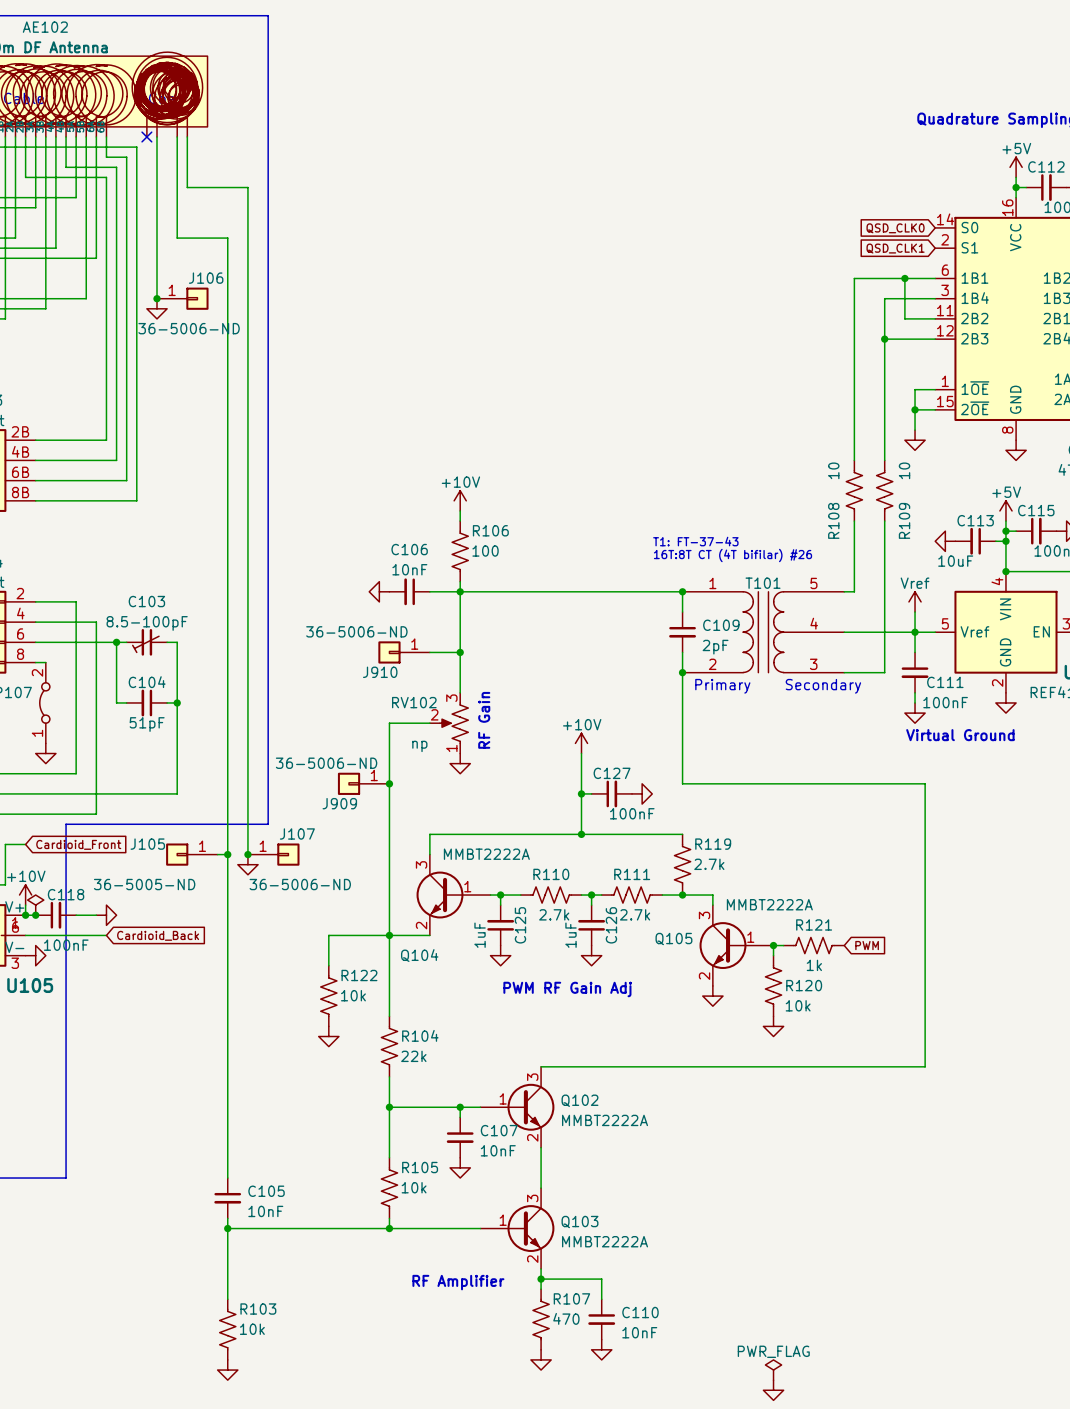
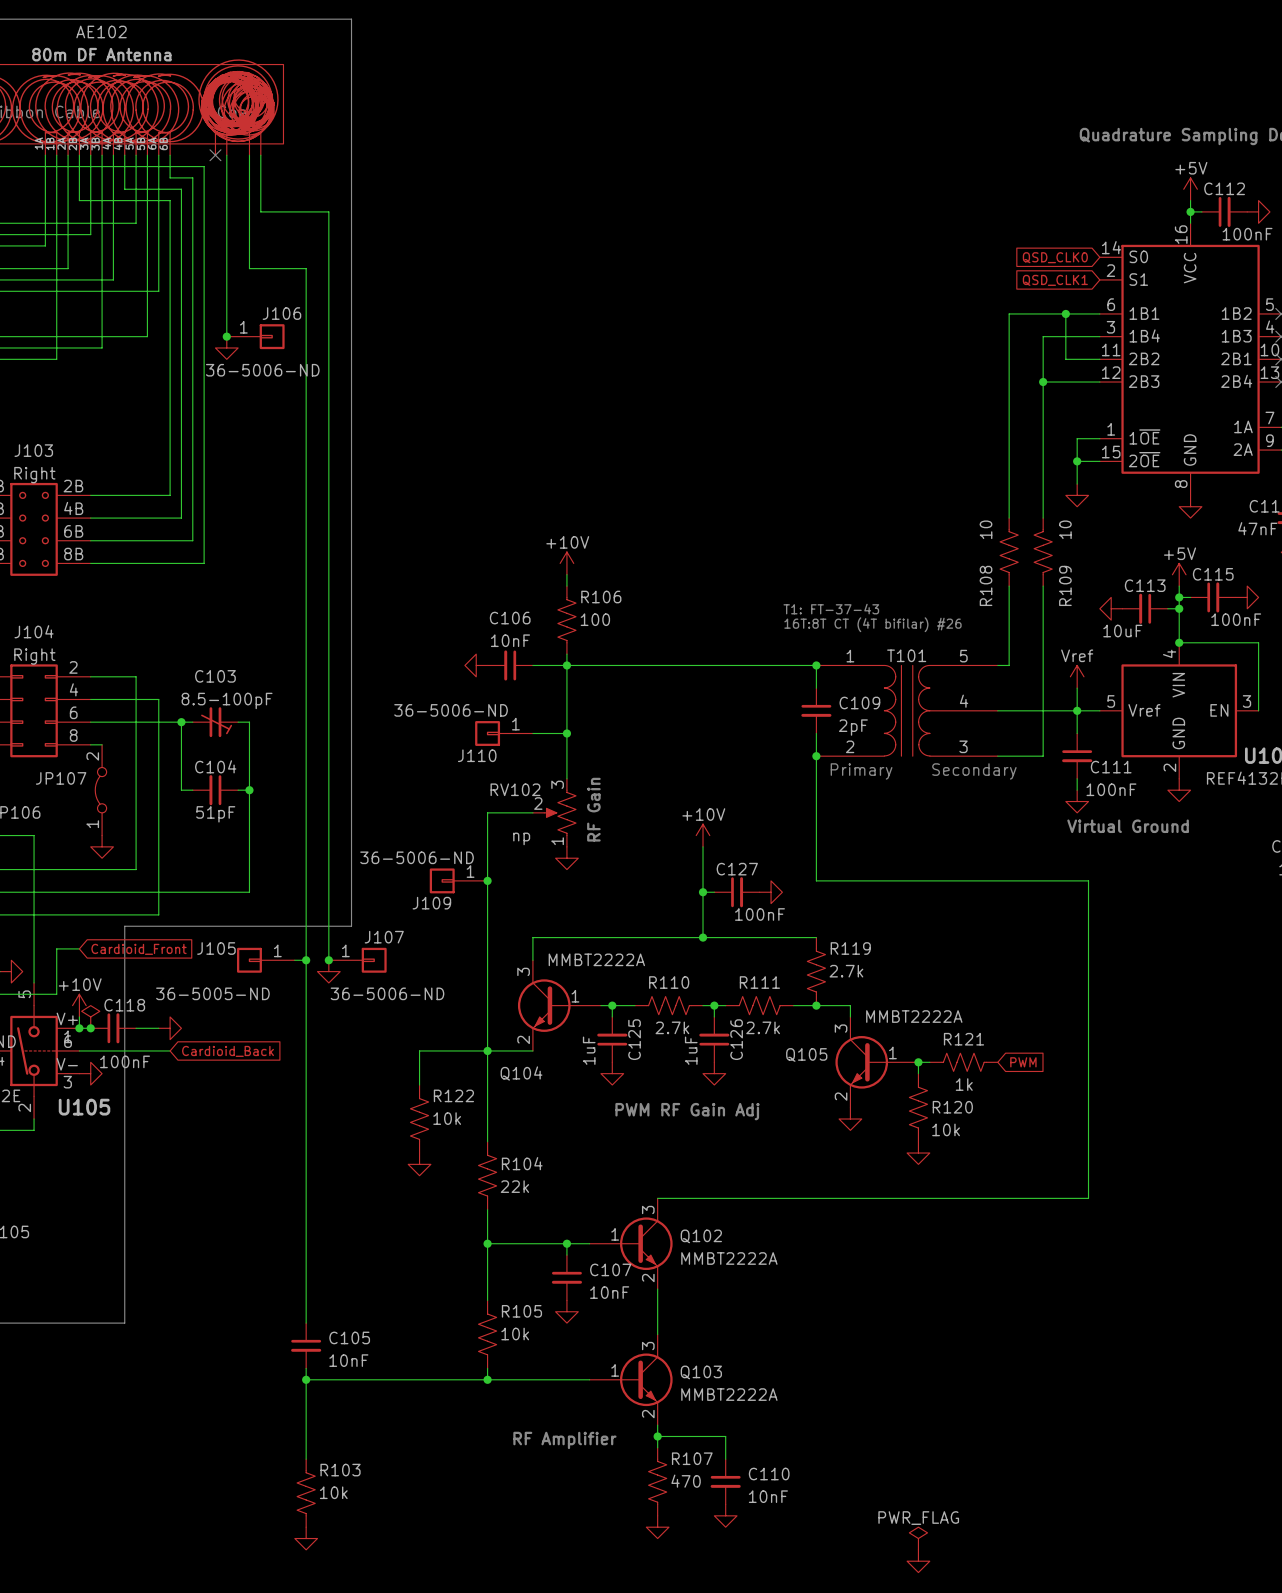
C103 flip: as is (145, 642) -> left-right (216, 722)
J910 name: J910 (380, 672) -> J110 (477, 755)
J909 name: J909 (339, 803) -> J109 (431, 903)

